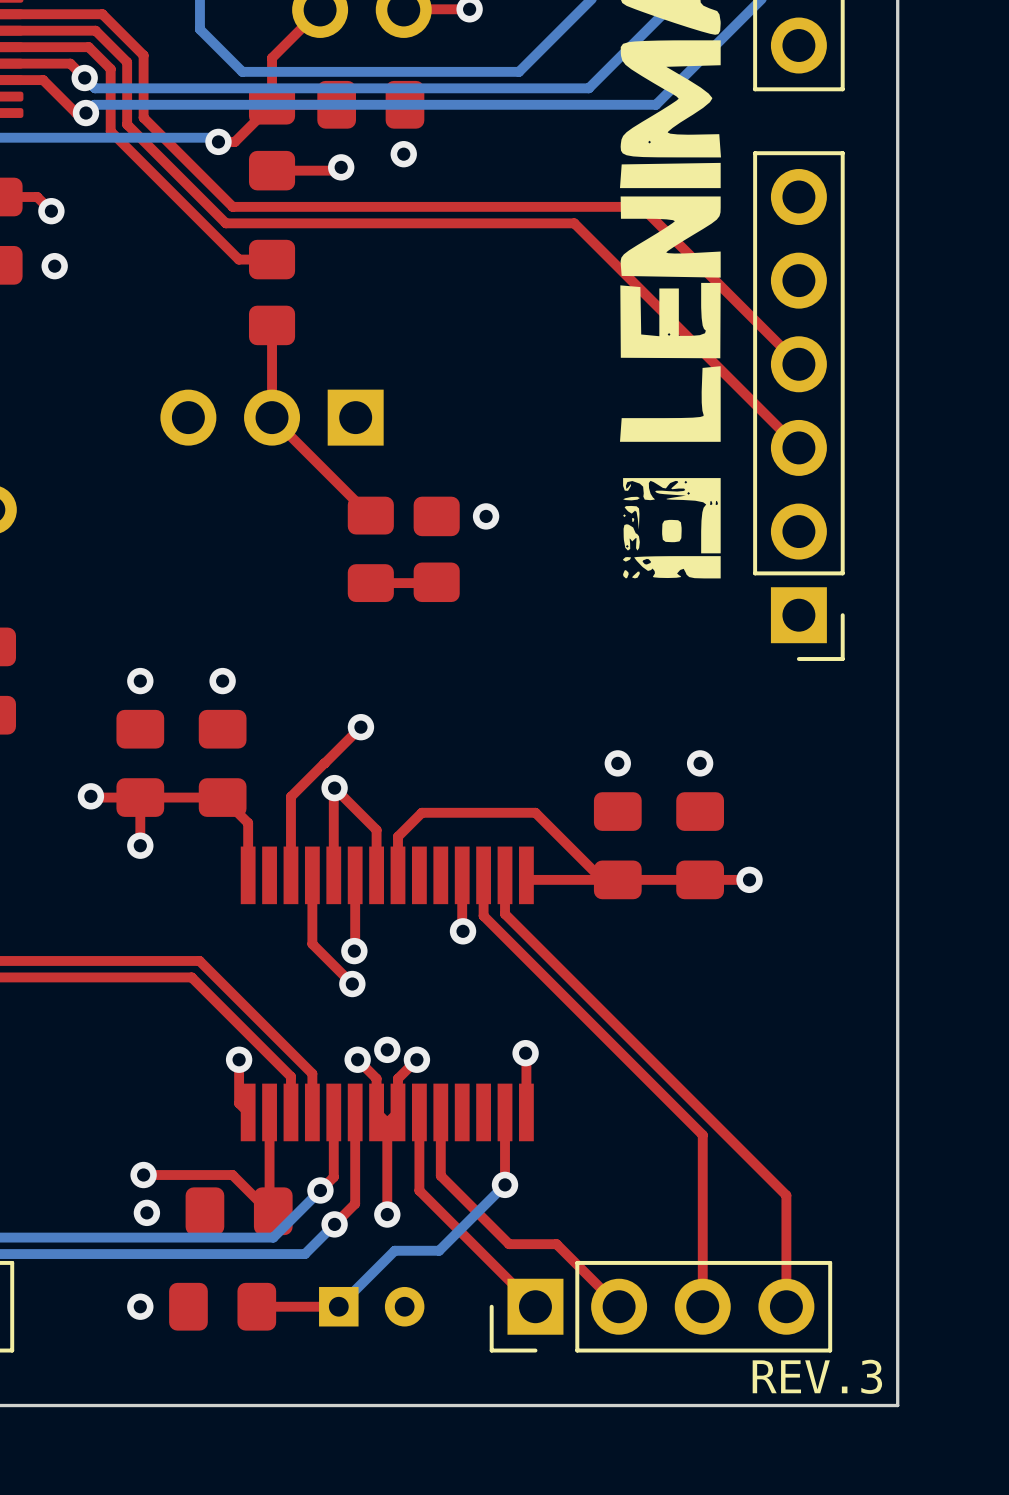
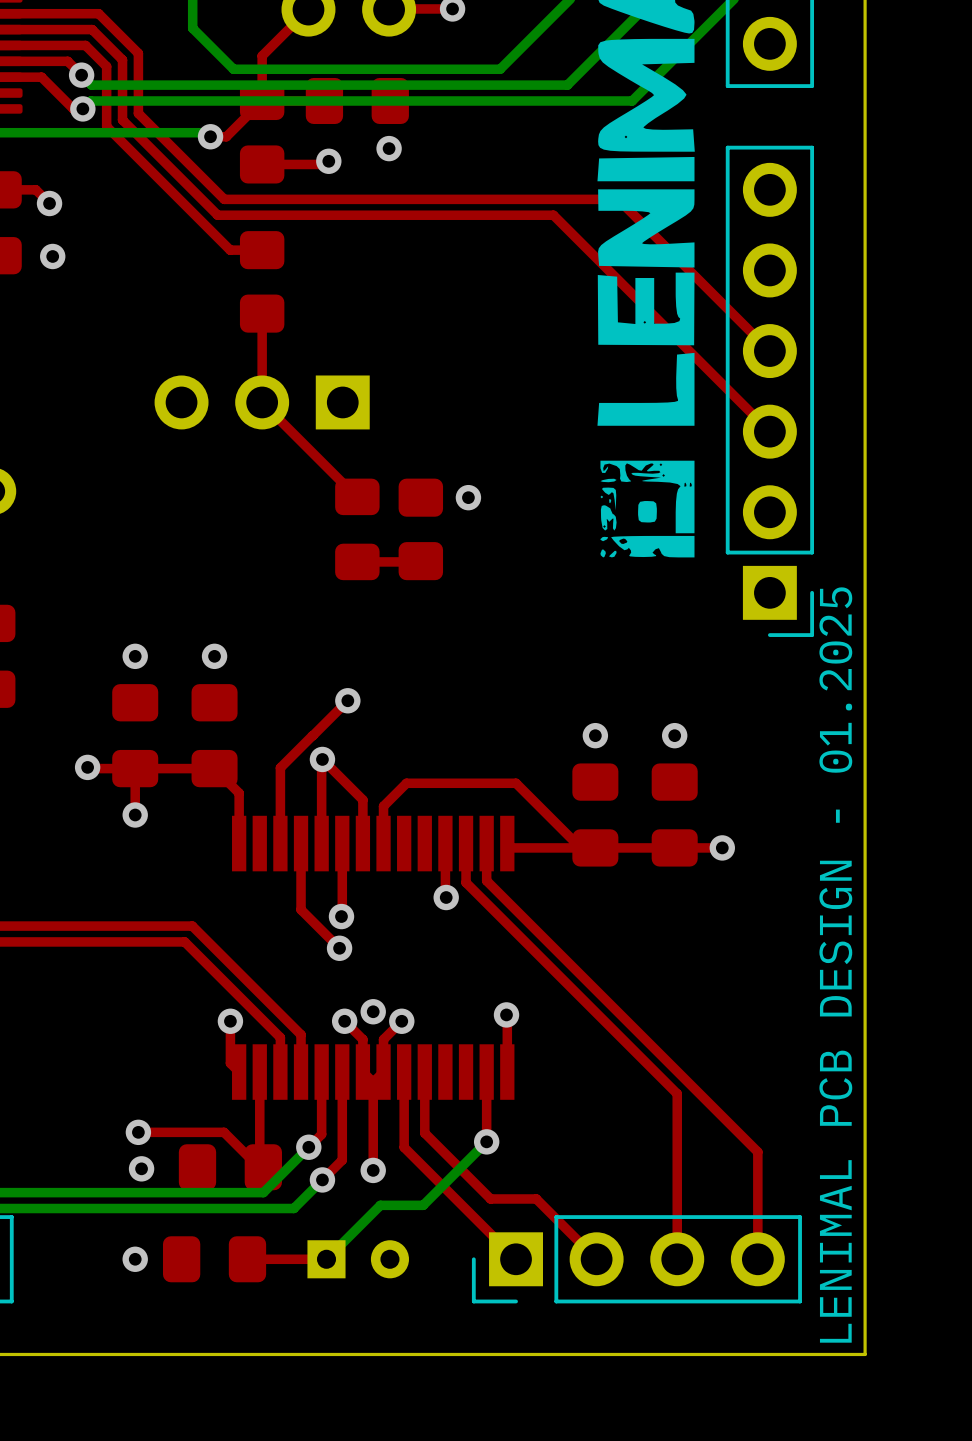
text: none -> LENIMAL PCB DESIGN - 01.2025 (835, 965)
text: REV.3 (817, 1376) -> none

